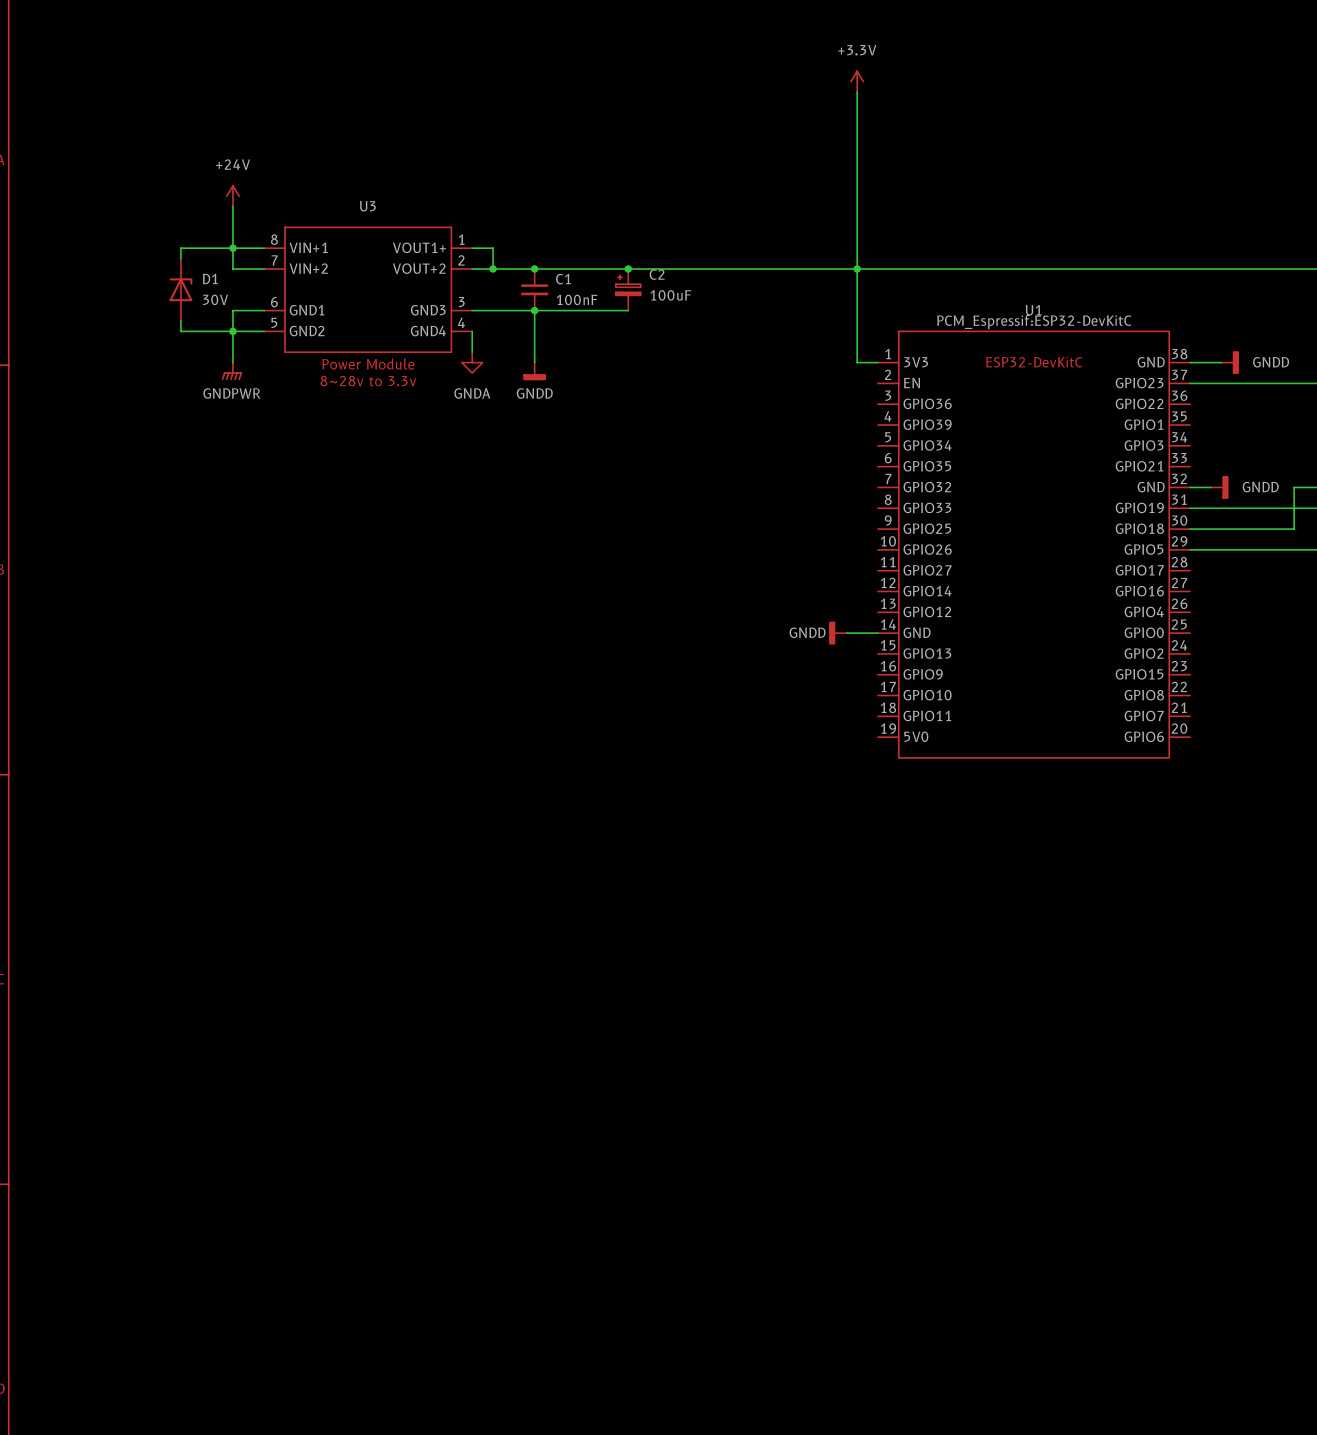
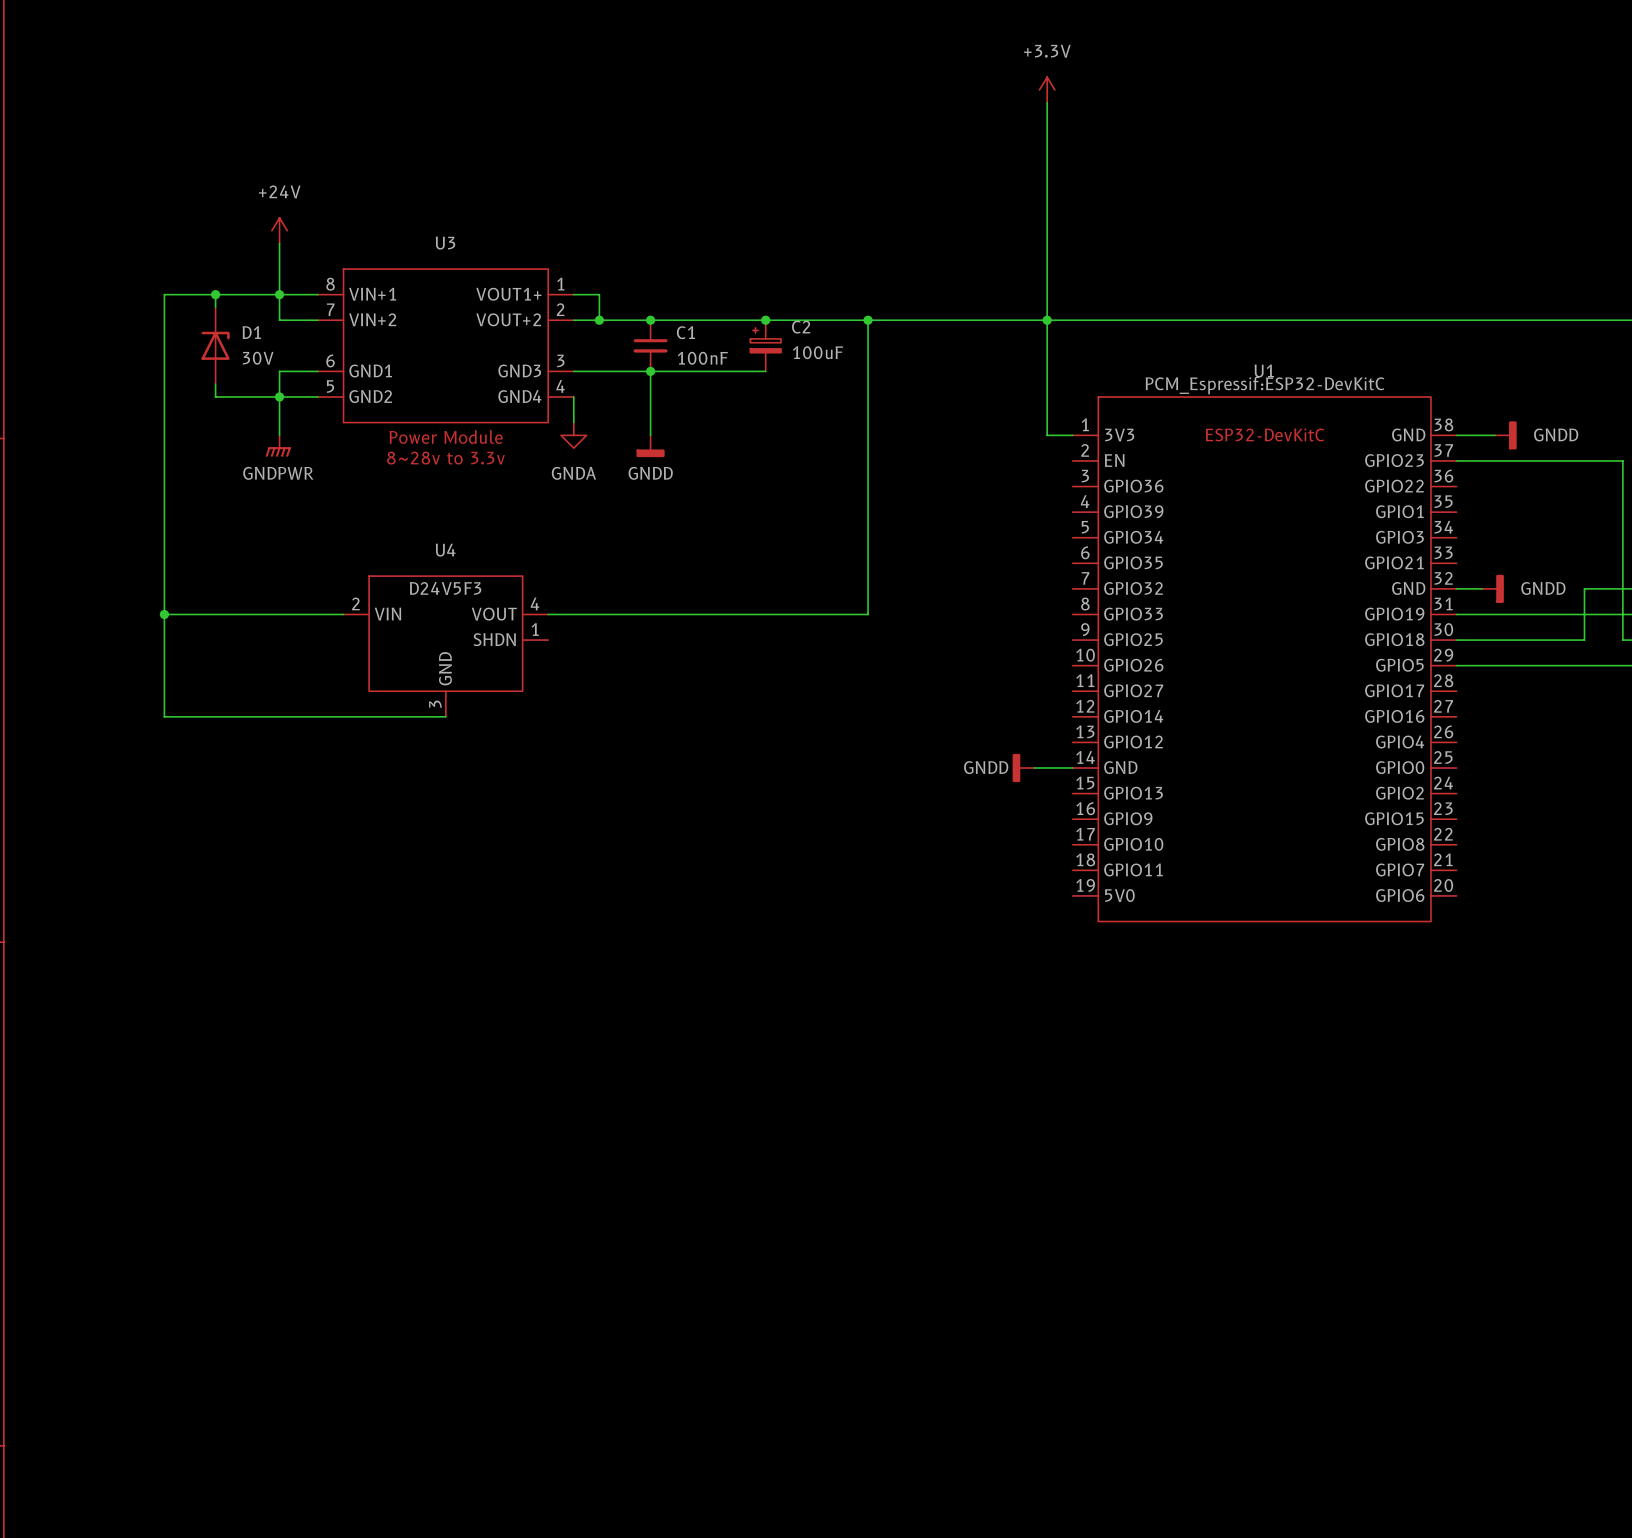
wire: none -> (215, 294) (164, 294) (164, 716) (445, 716)
junction: none -> (215, 294)
wire: none -> (868, 320) (868, 614) (548, 614)
junction: none -> (868, 320)
wire: none -> (164, 614) (343, 614)
junction: none -> (164, 614)
U4: none -> D24V5F3 (445, 646)

